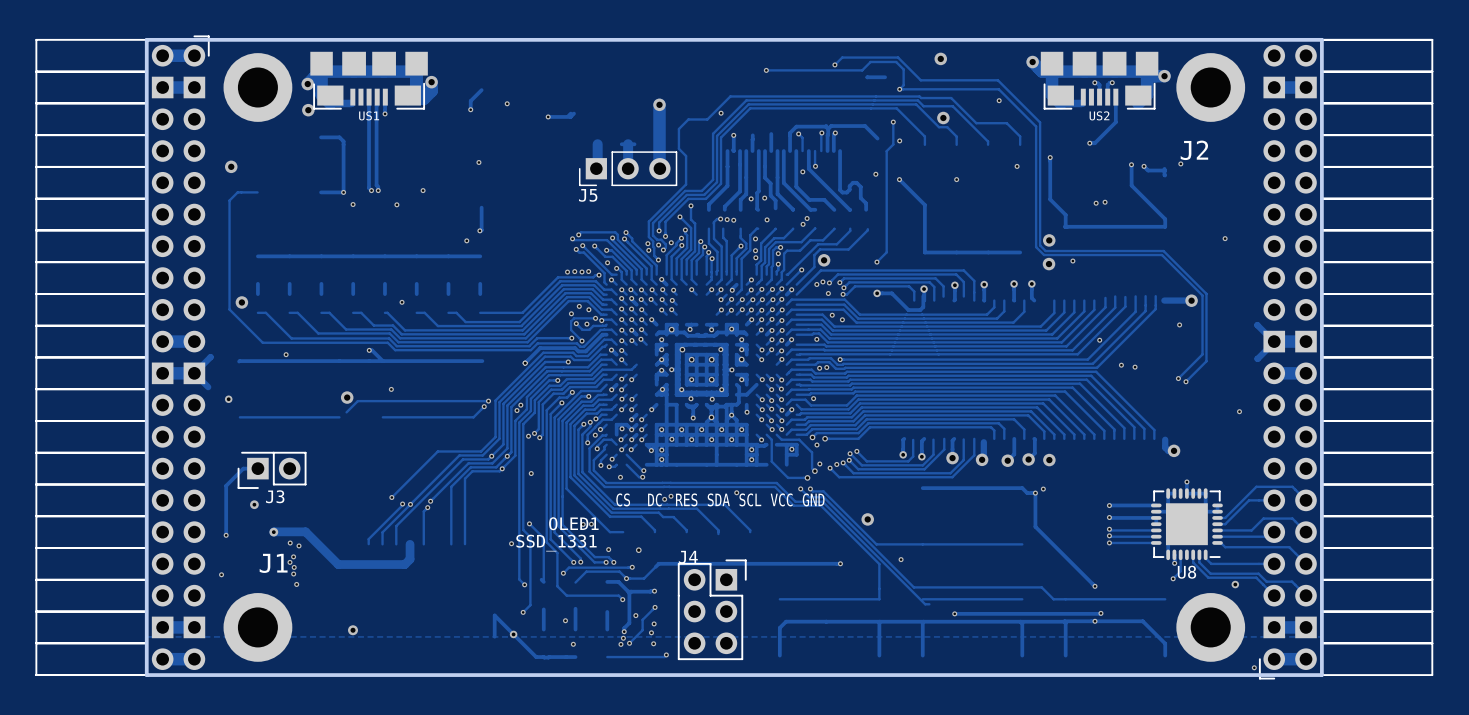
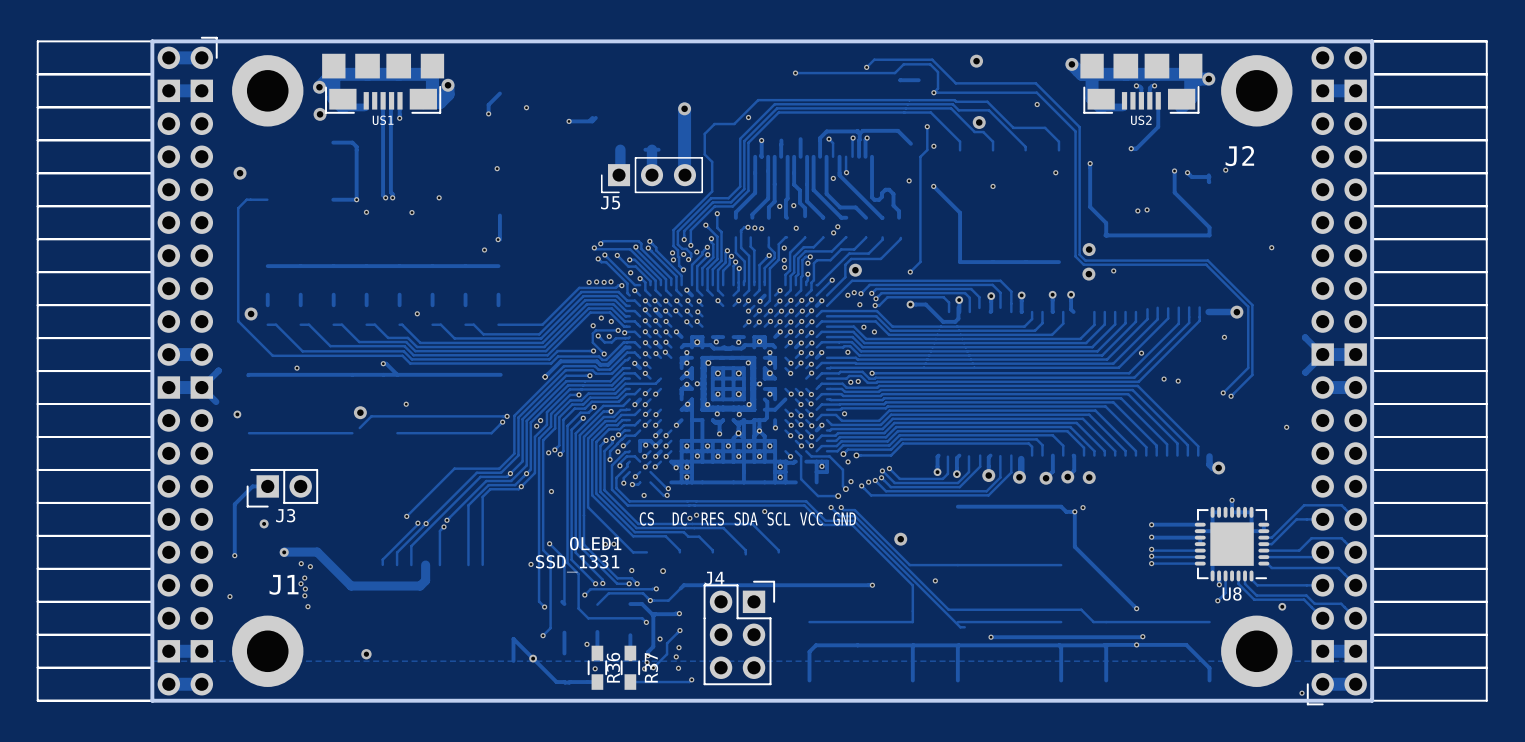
R36: none -> (597, 667)
R37: none -> (630, 667)

